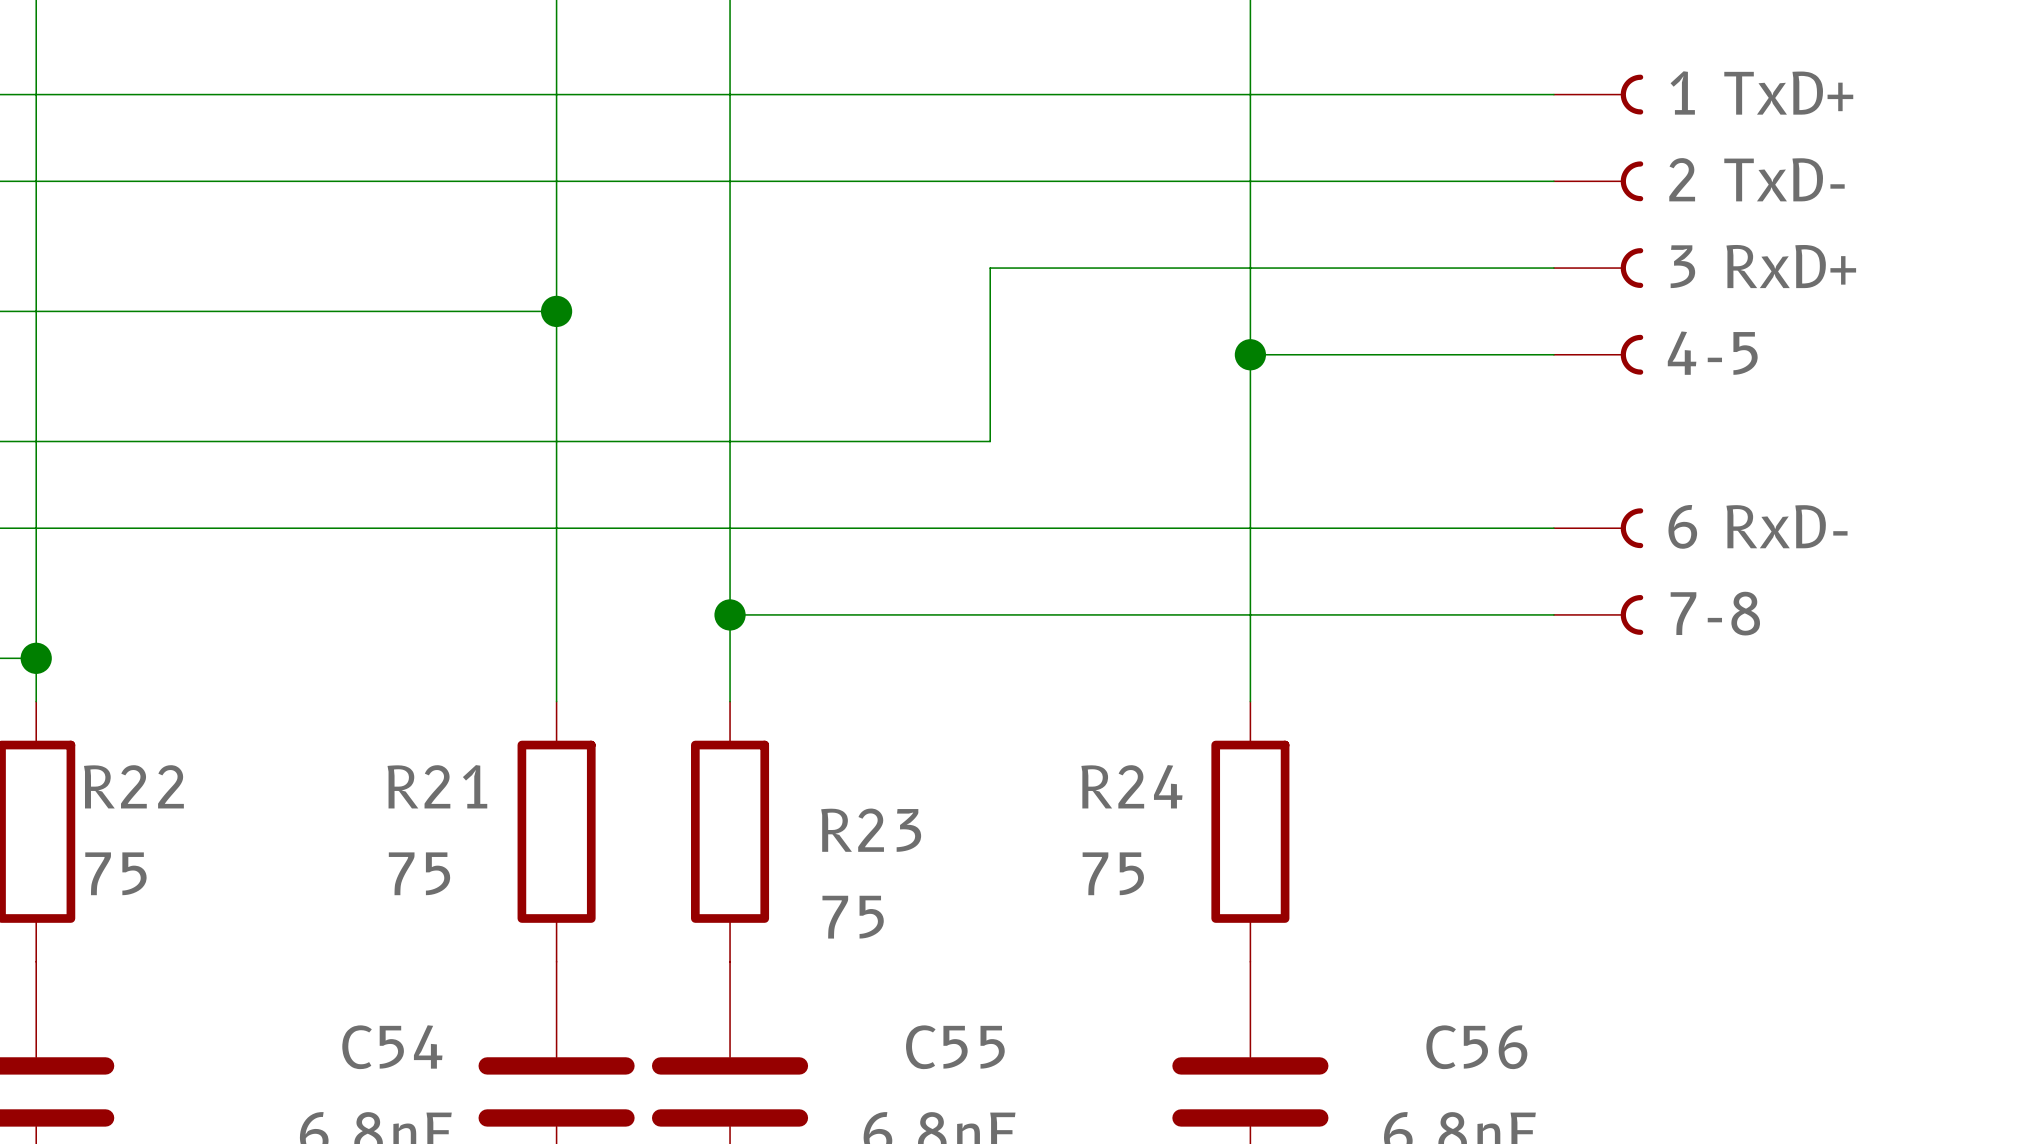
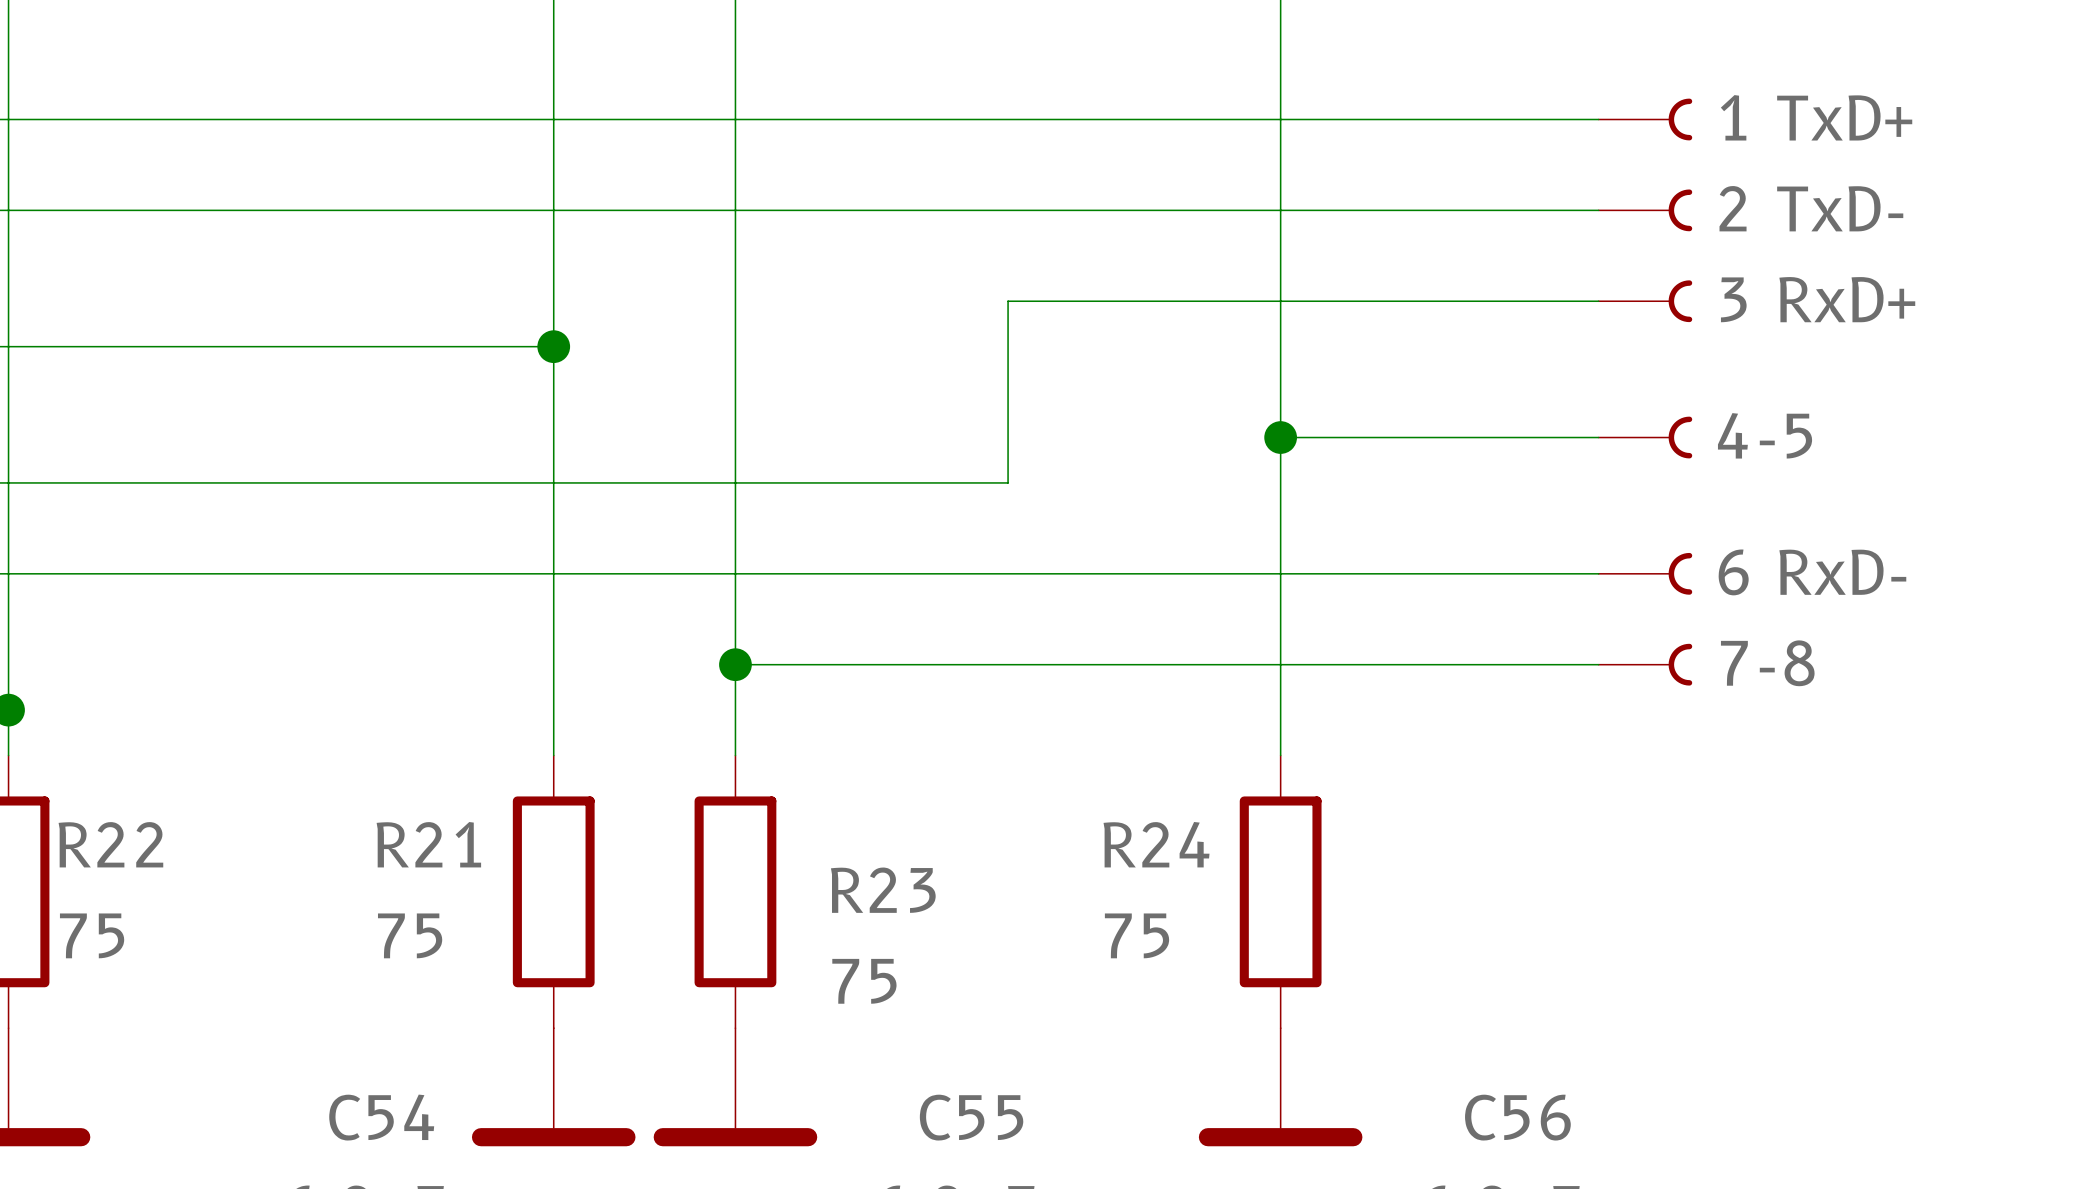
wire: (1250, 354) (1553, 354) -> (1280, 437) (1598, 437)
junction position: (1250, 354) -> (1280, 437)
part position: (1598, 354) -> (1645, 437)

